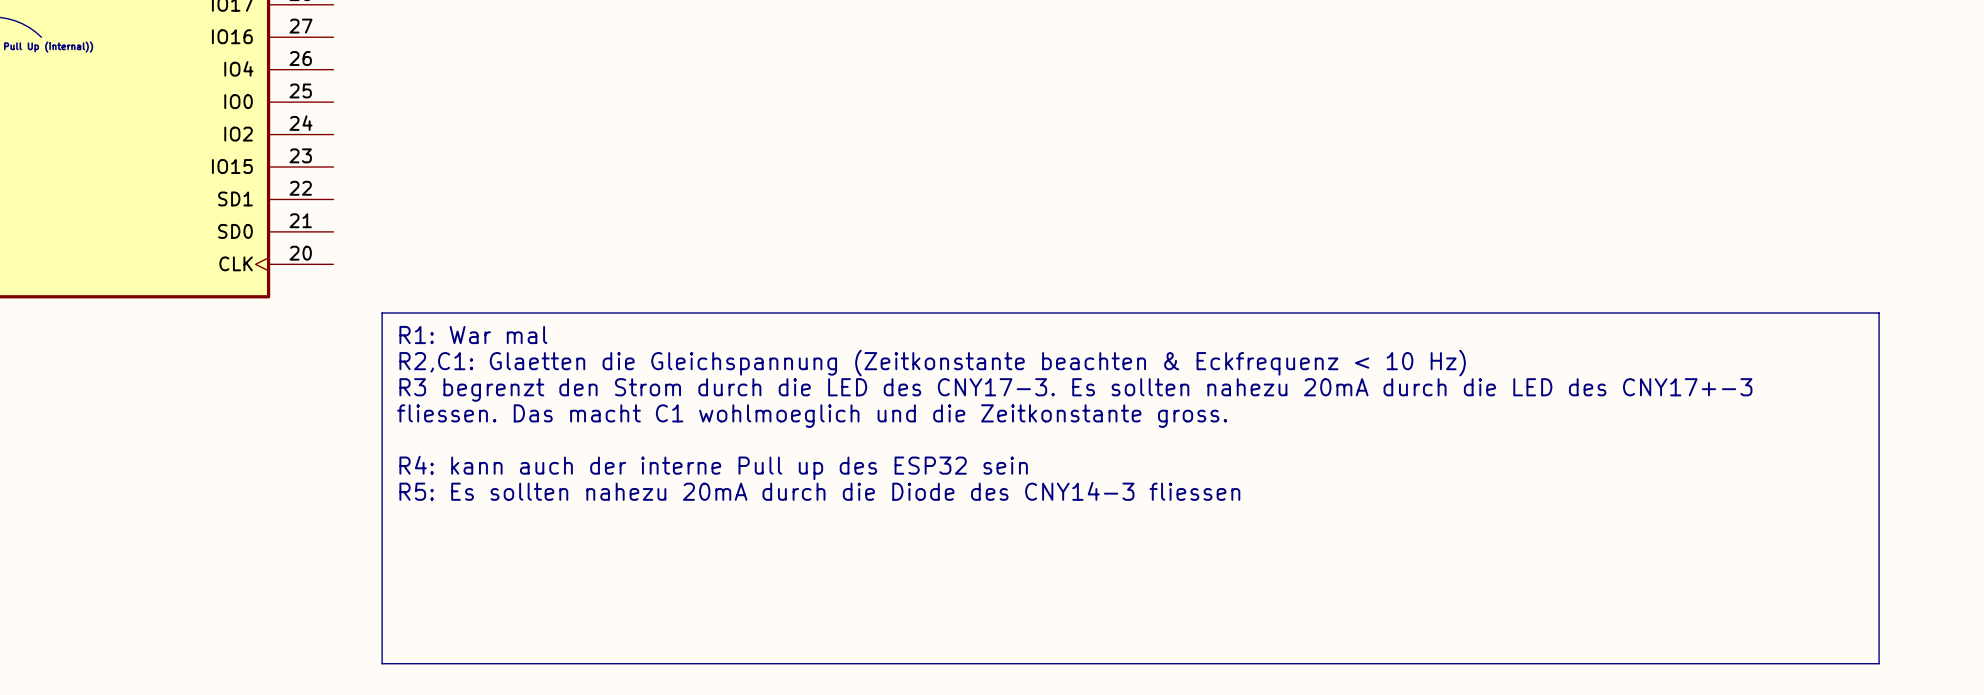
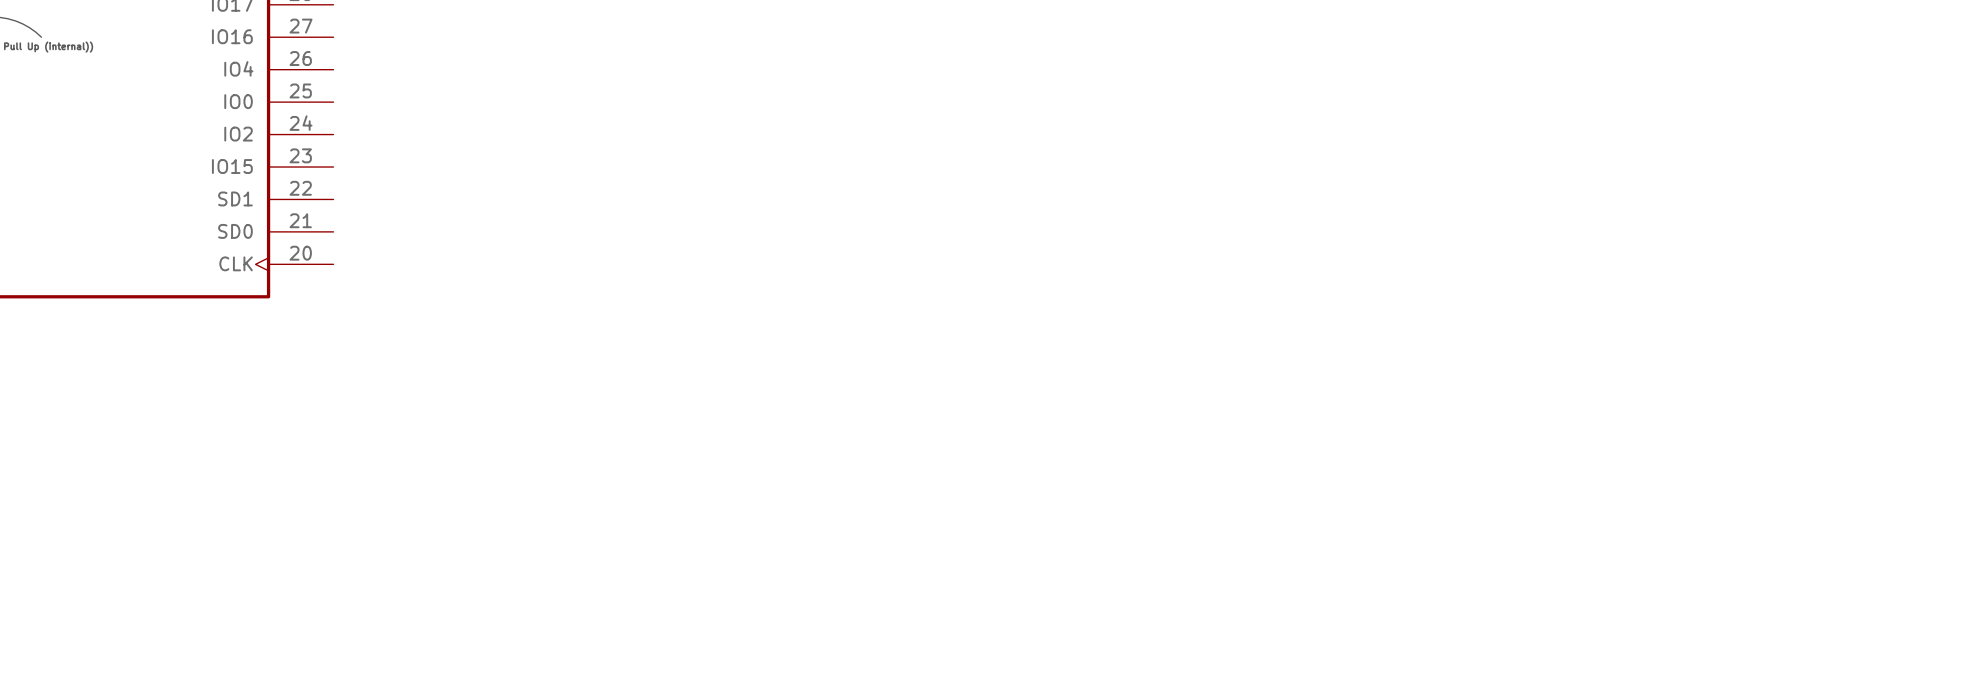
line: (382, 313) (1879, 313) (1879, 663) (382, 663) (382, 313) -> none
text: R1: War mal (473, 335) -> none
text: R2,C1: Glaetten die Gleichspannung (Zeitkonstante beachten & Eckfrequenz < 10 Hz) (932, 363) -> none
text: R3 begrenzt den Strom durch die LED des CNY17-3. Es sollten nahezu 20mA durch die LED des CNY17+-3 (1075, 389) -> none
text: fliessen. Das macht C1 wohlmoeglich und die Zeitkonstante gross. (812, 416) -> none
text: R4: kann auch der interne Pull up des ESP32 sein (713, 467) -> none
text: R5: Es sollten nahezu 20mA durch die Diode des CNY14-3 fliessen (819, 491) -> none

